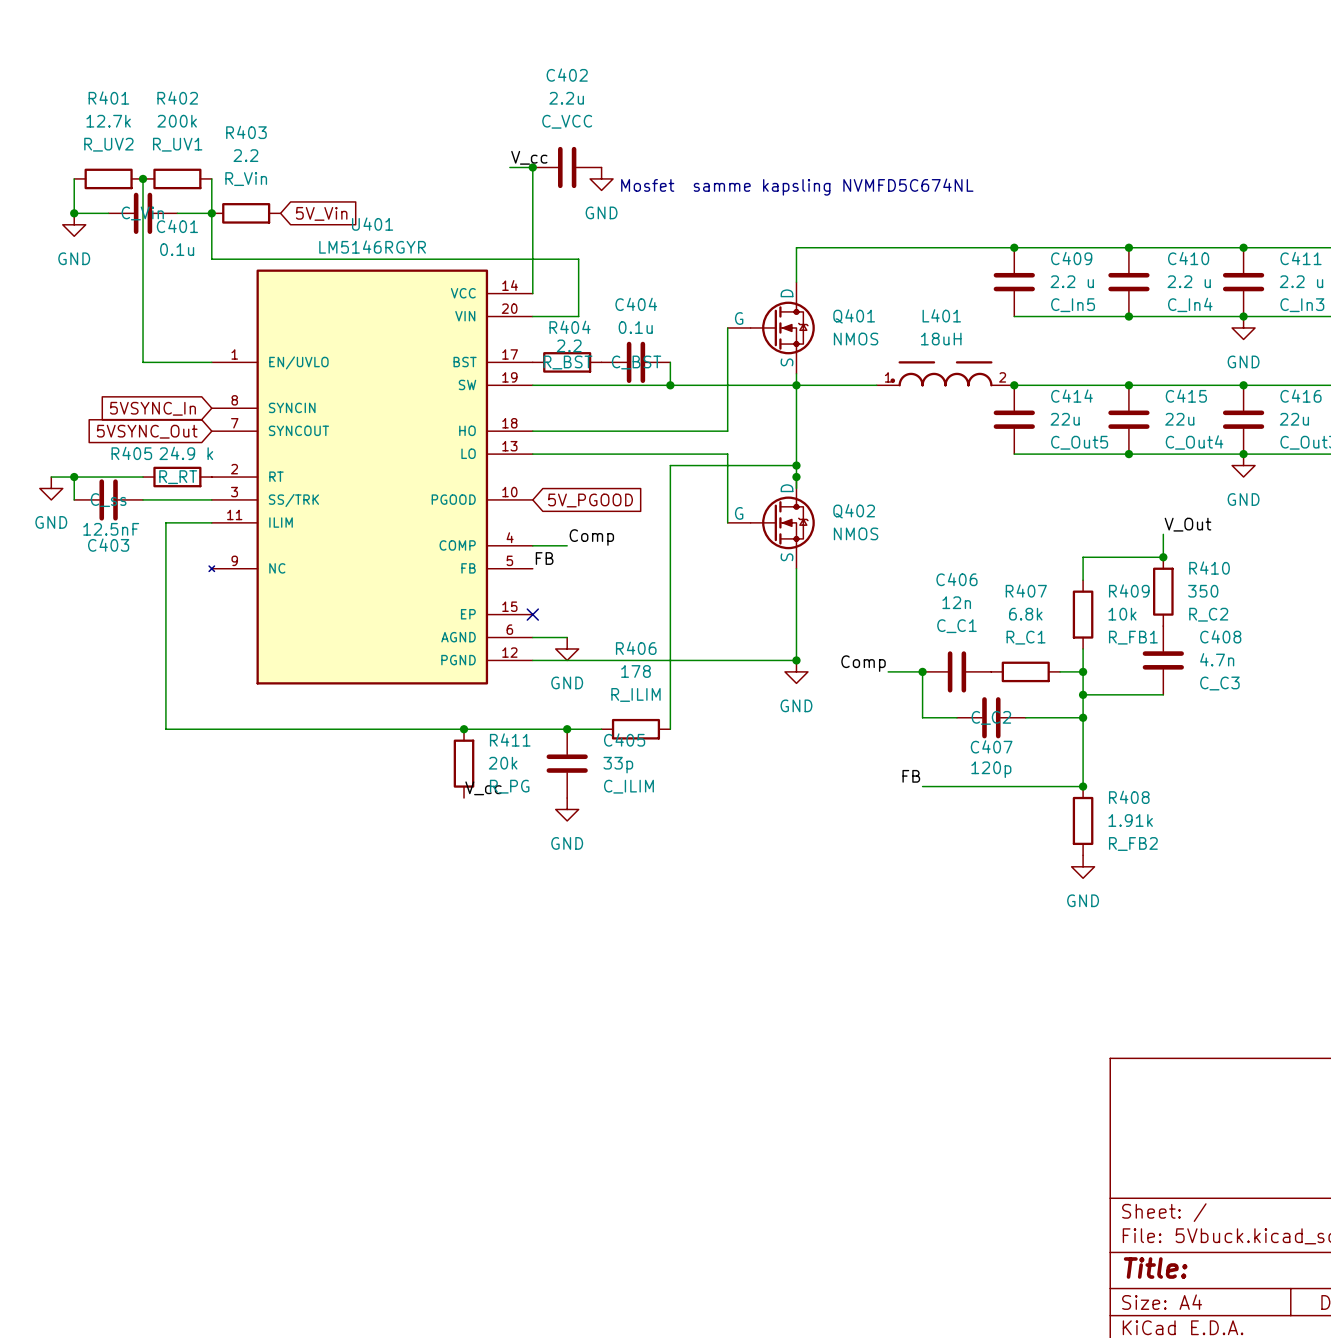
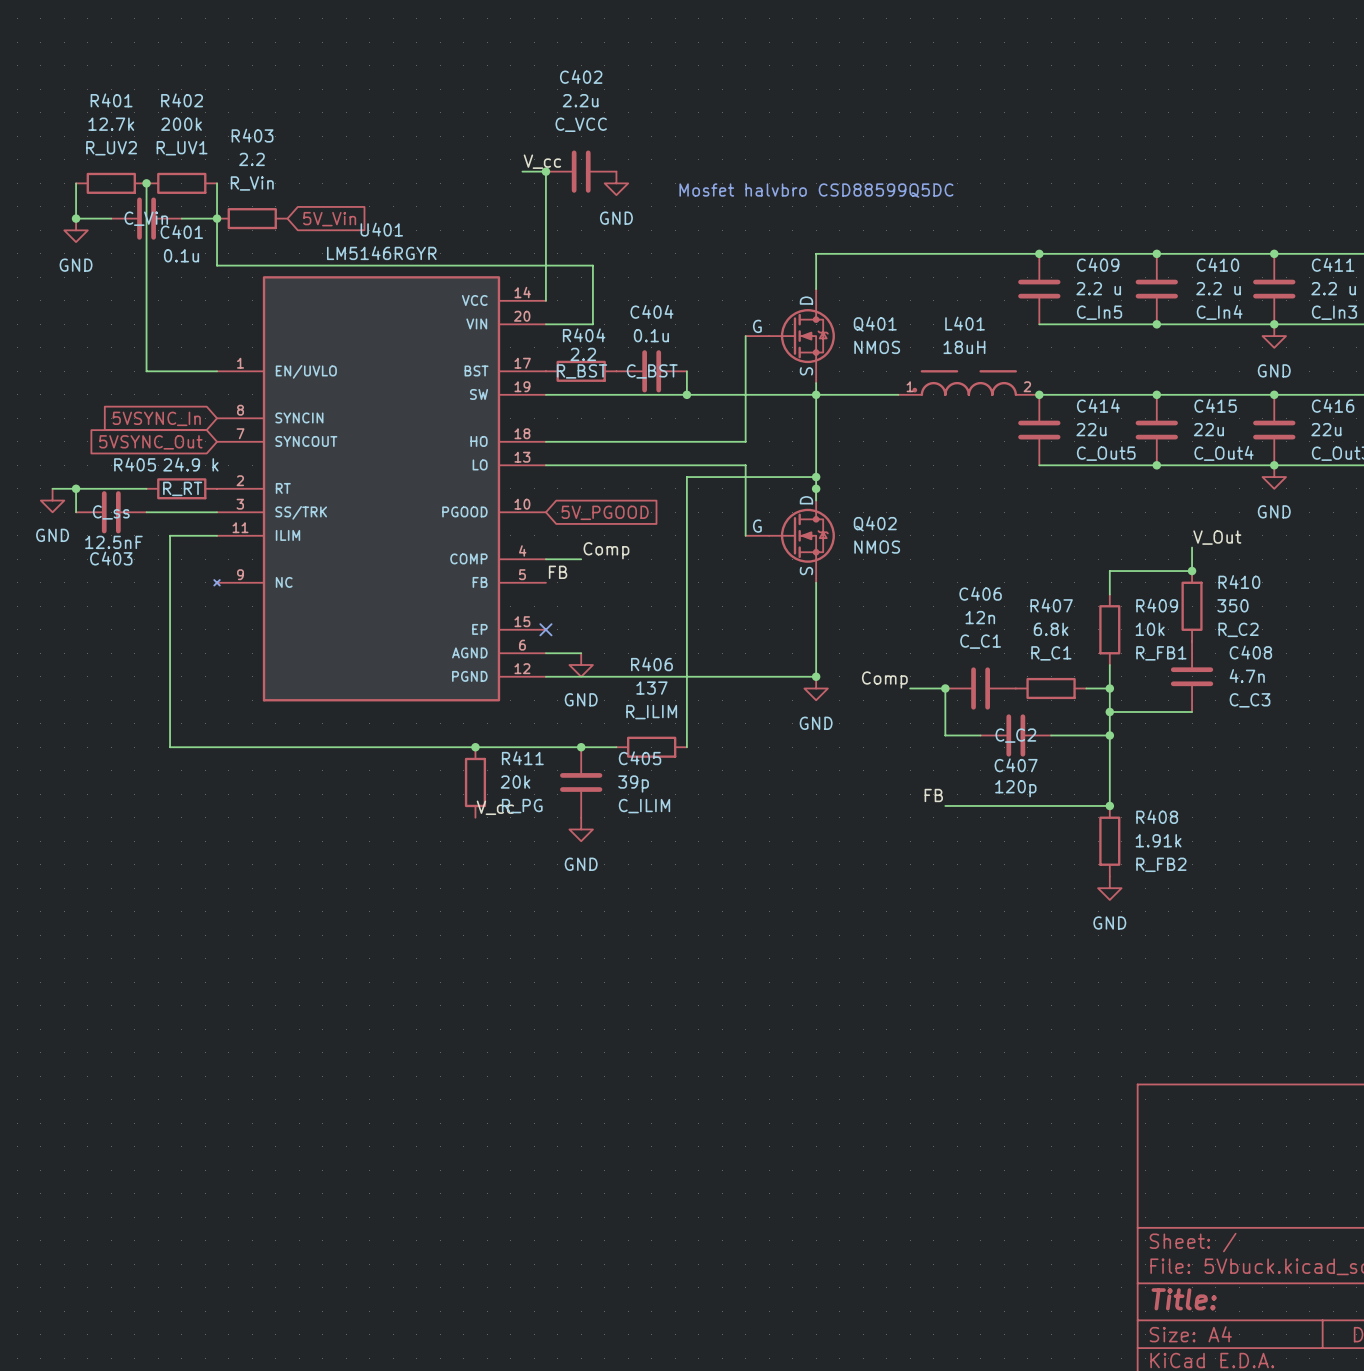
text: Mosfet samme kapsling NVMFD5C674NL (797, 187) -> Mosfet halvbro CSD88599Q5DC (816, 190)
R406 value: 178 (635, 671) -> 137 (651, 688)
C405 value: 33p (618, 765) -> 39p (633, 783)

